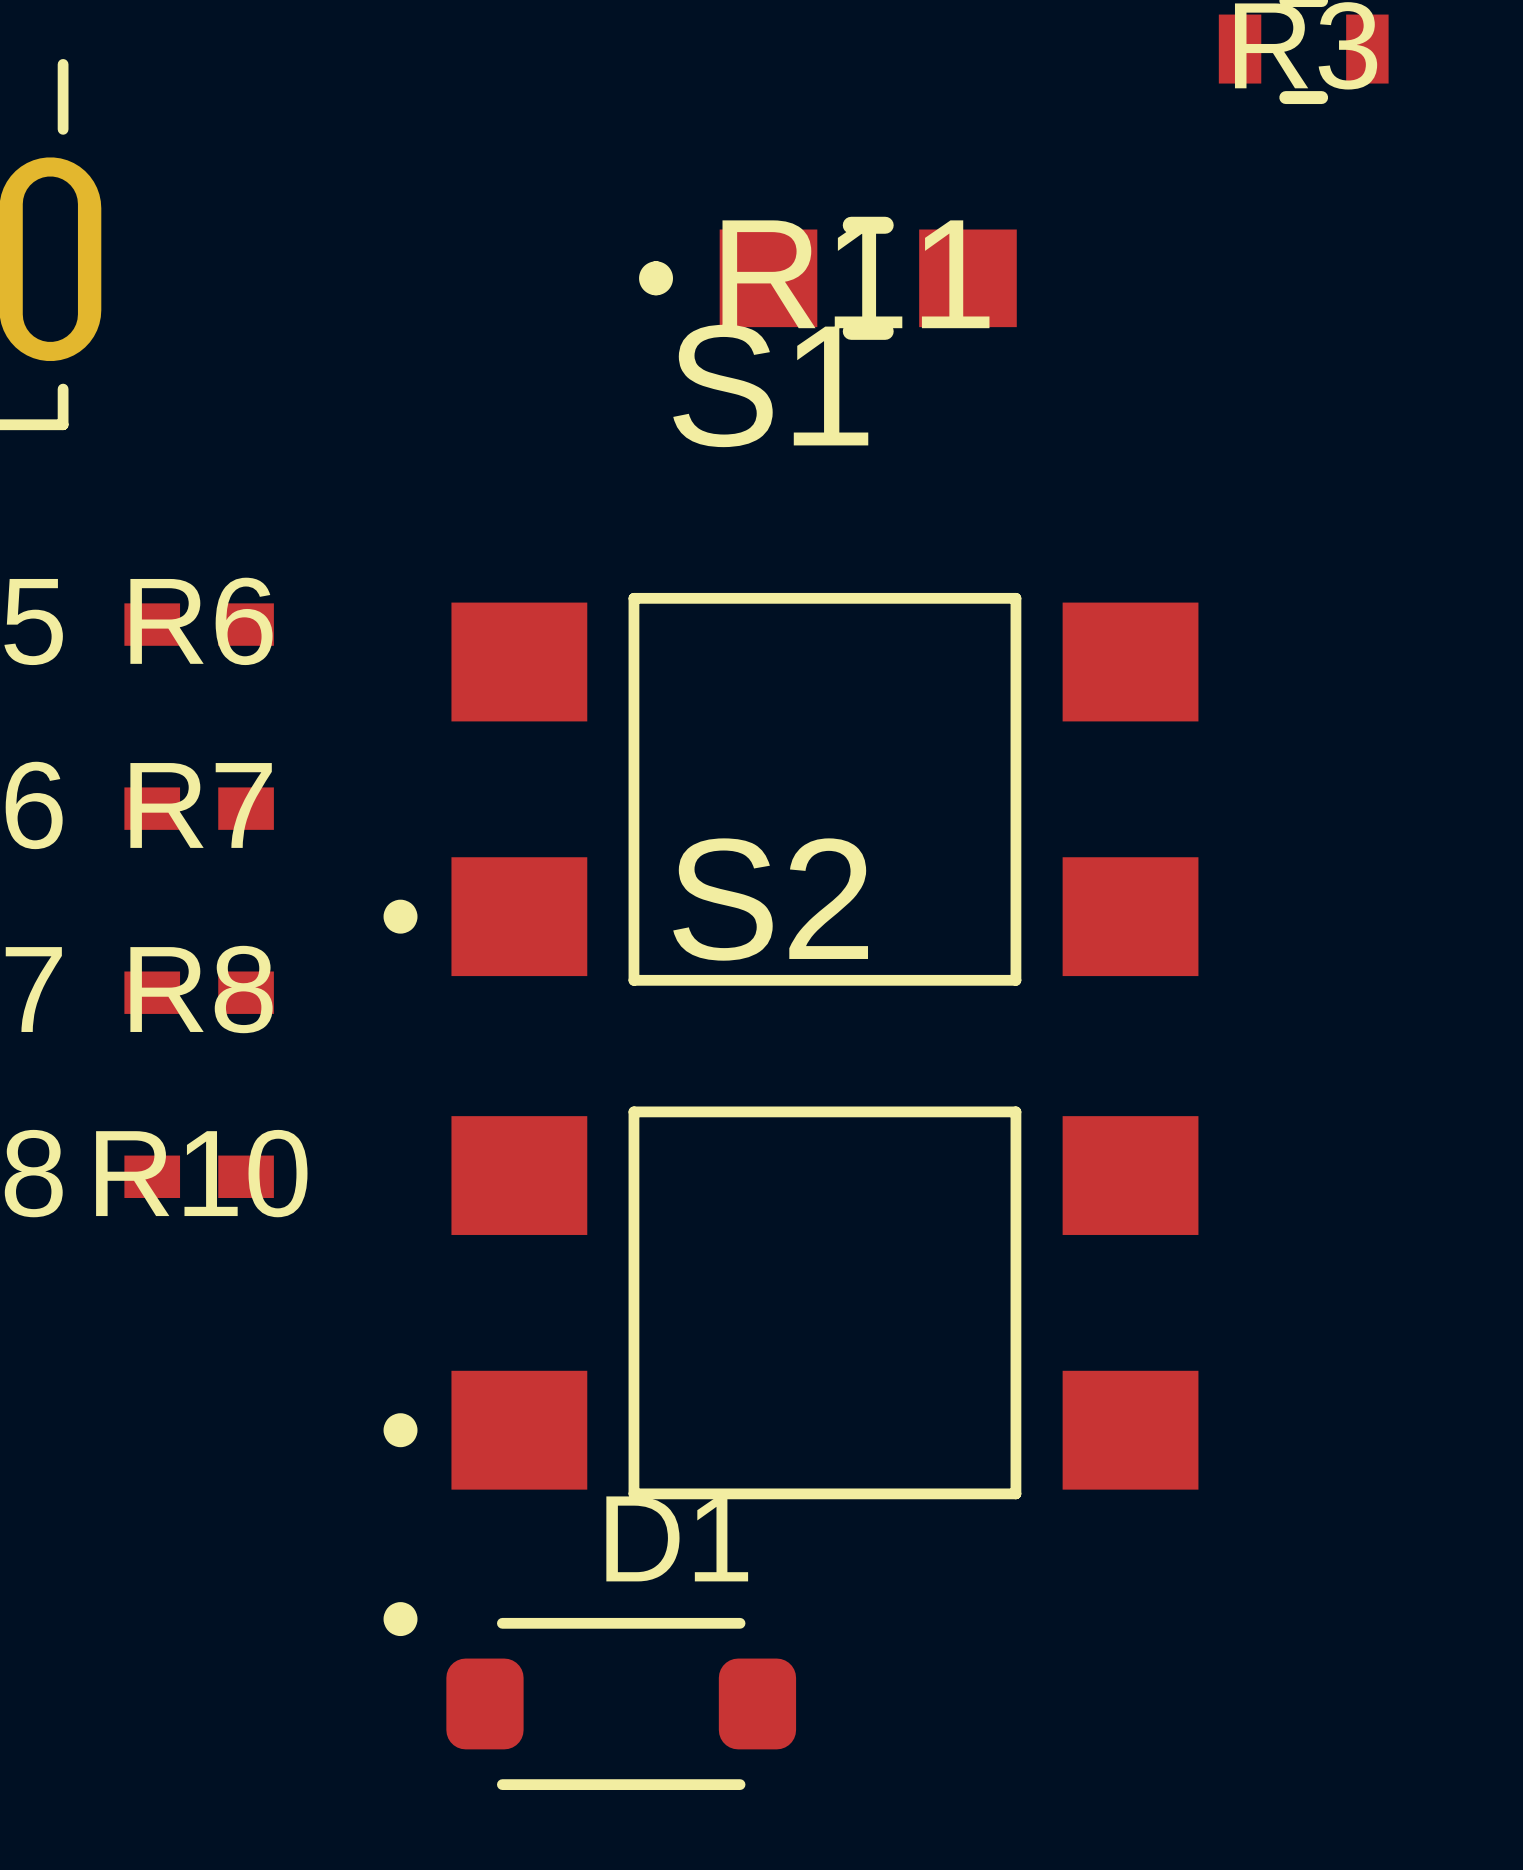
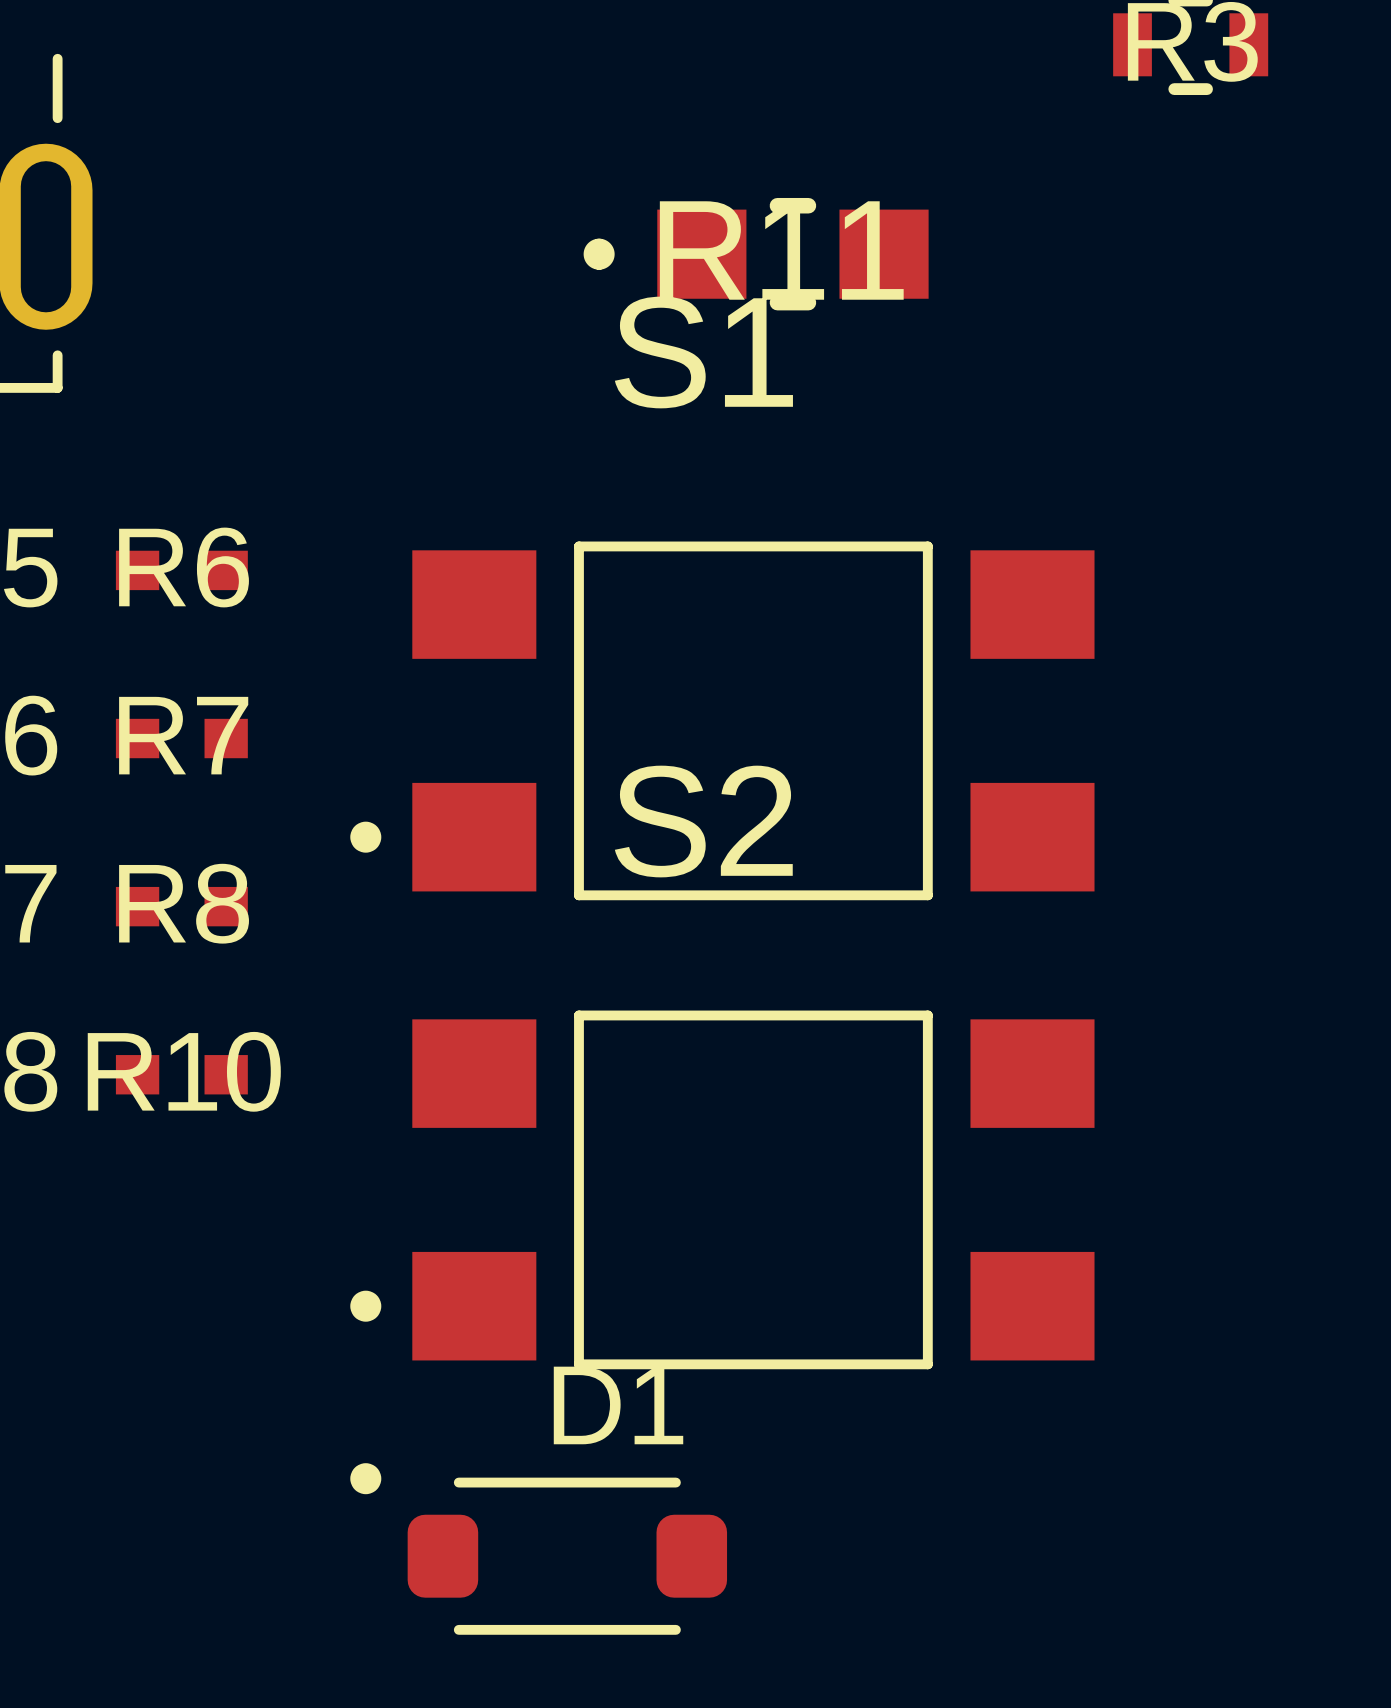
R6 footprint: [124, 603, 274, 646] -> [115, 550, 248, 591]
R7 footprint: [124, 787, 274, 830] -> [115, 718, 248, 759]
R8 footprint: [124, 971, 274, 1014] -> [115, 886, 248, 927]
R10 footprint: [124, 1155, 274, 1199] -> [115, 1055, 248, 1095]

